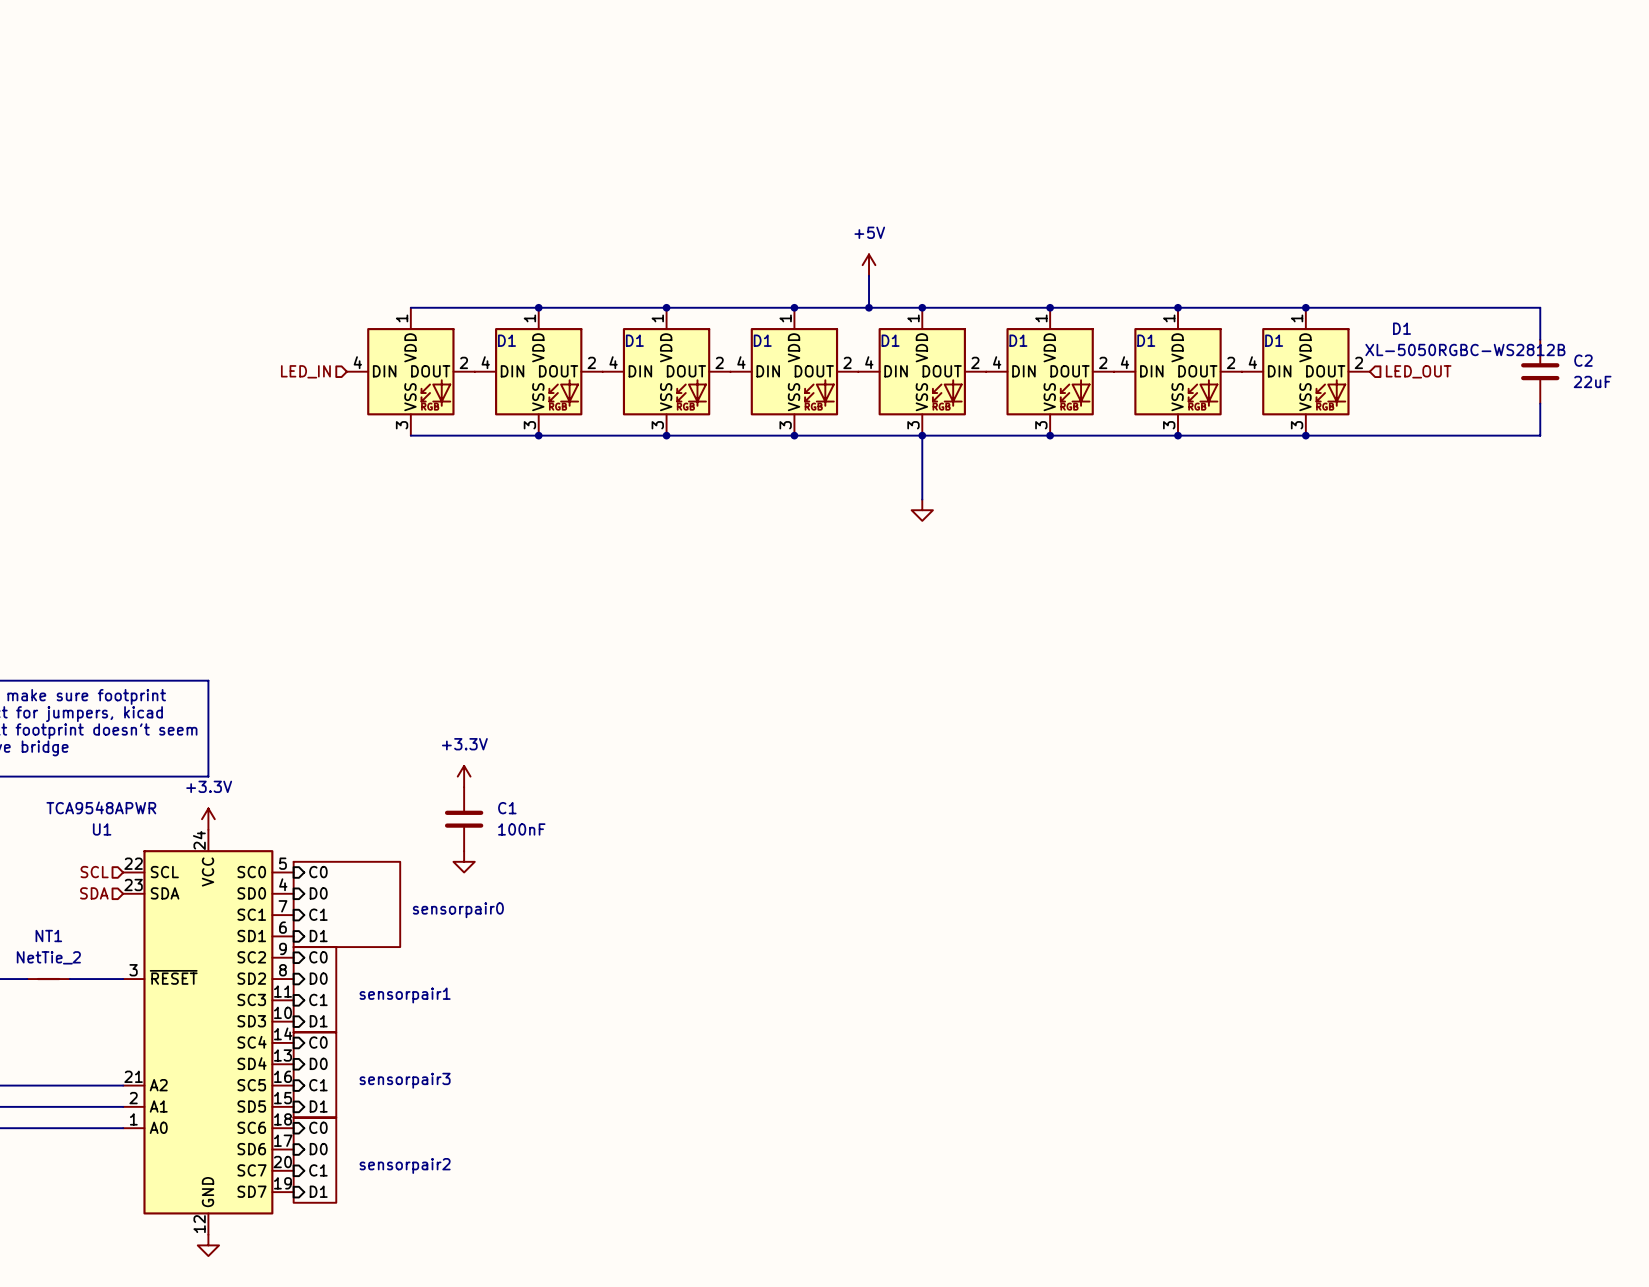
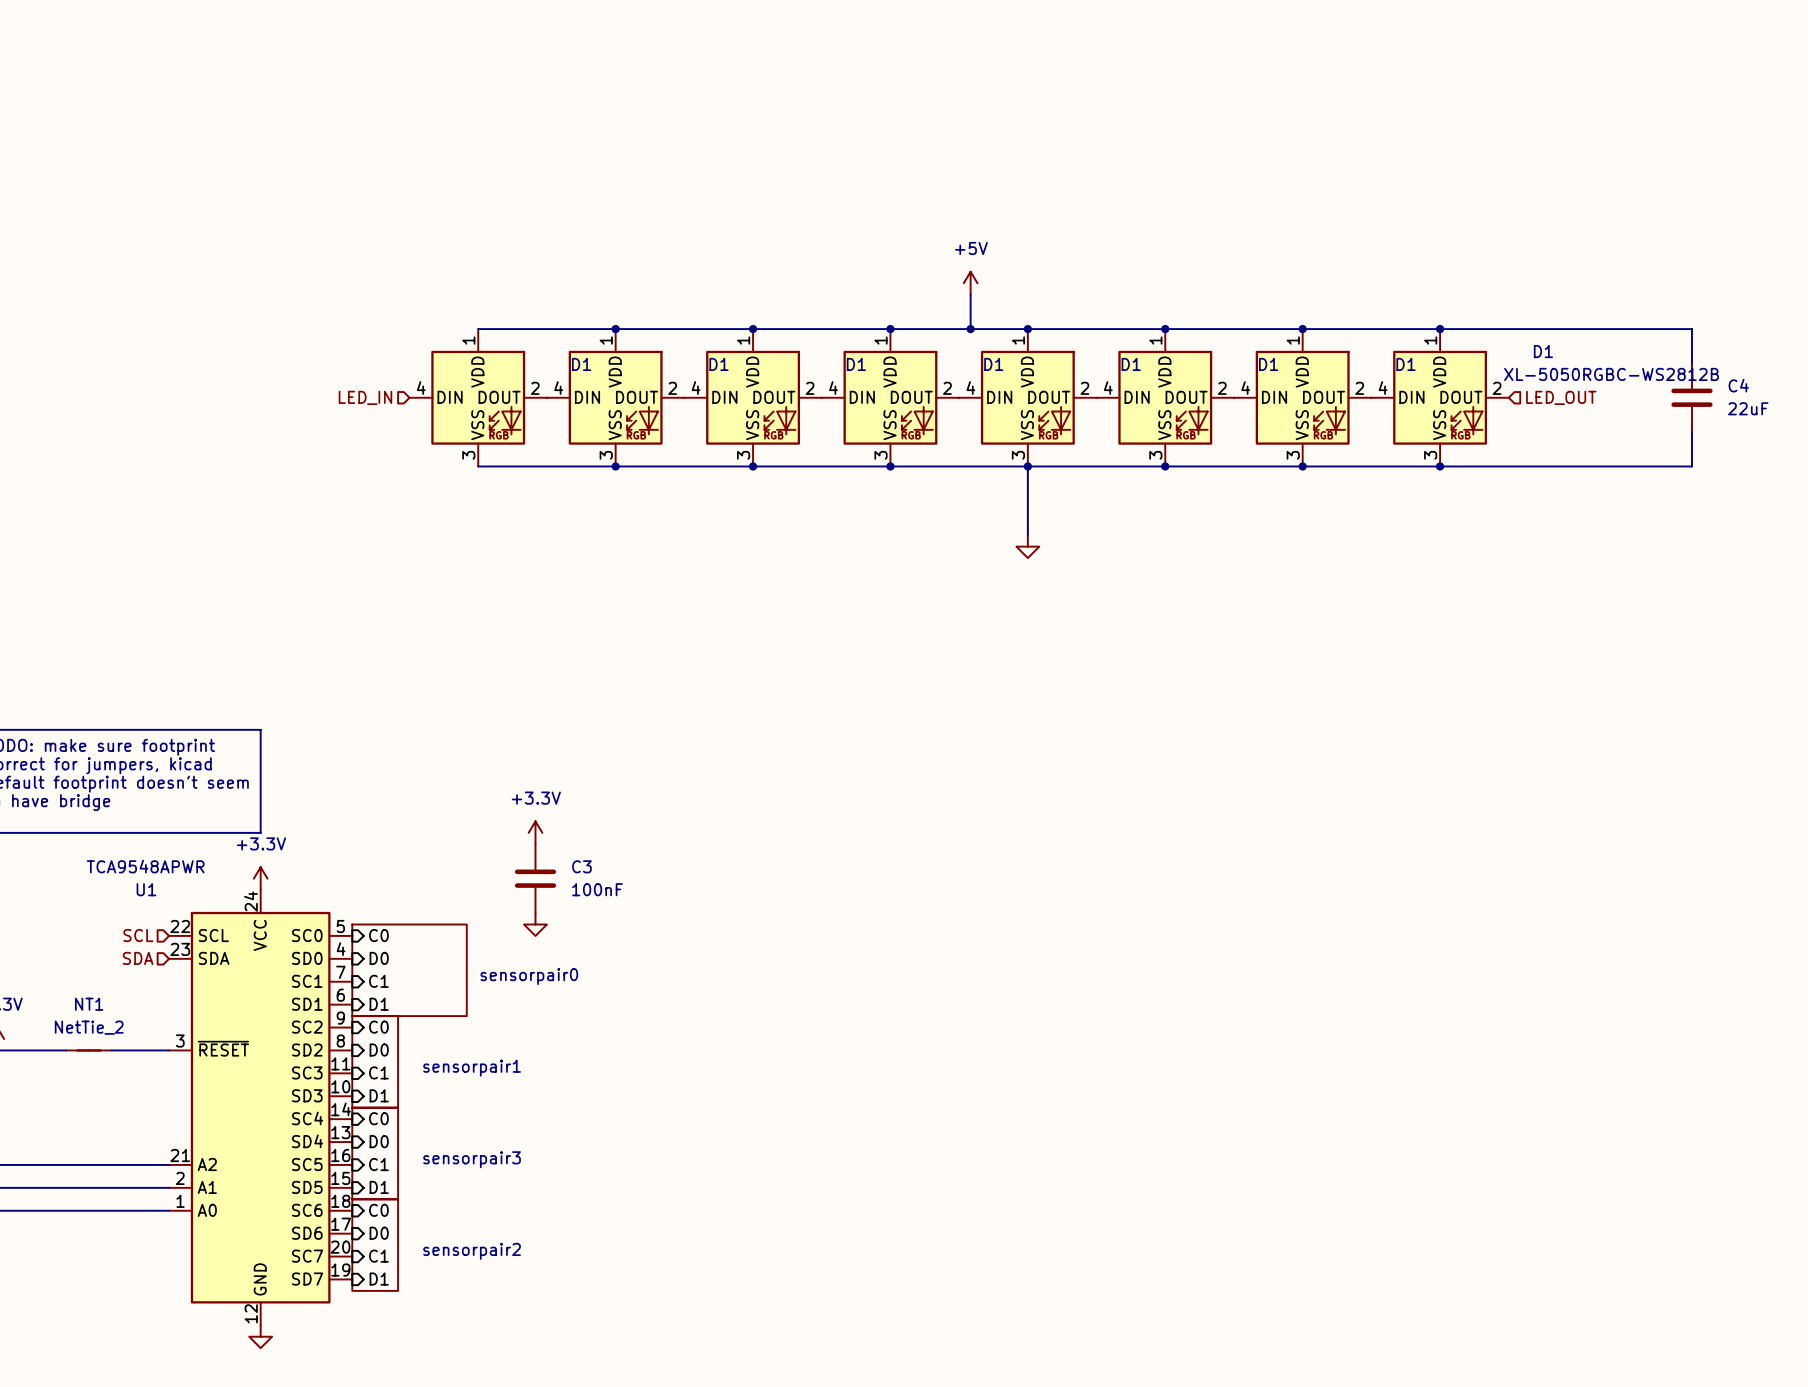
C2 name: C2 (1583, 360) -> C4 (1738, 385)
C1 name: C1 (507, 808) -> C3 (581, 866)

